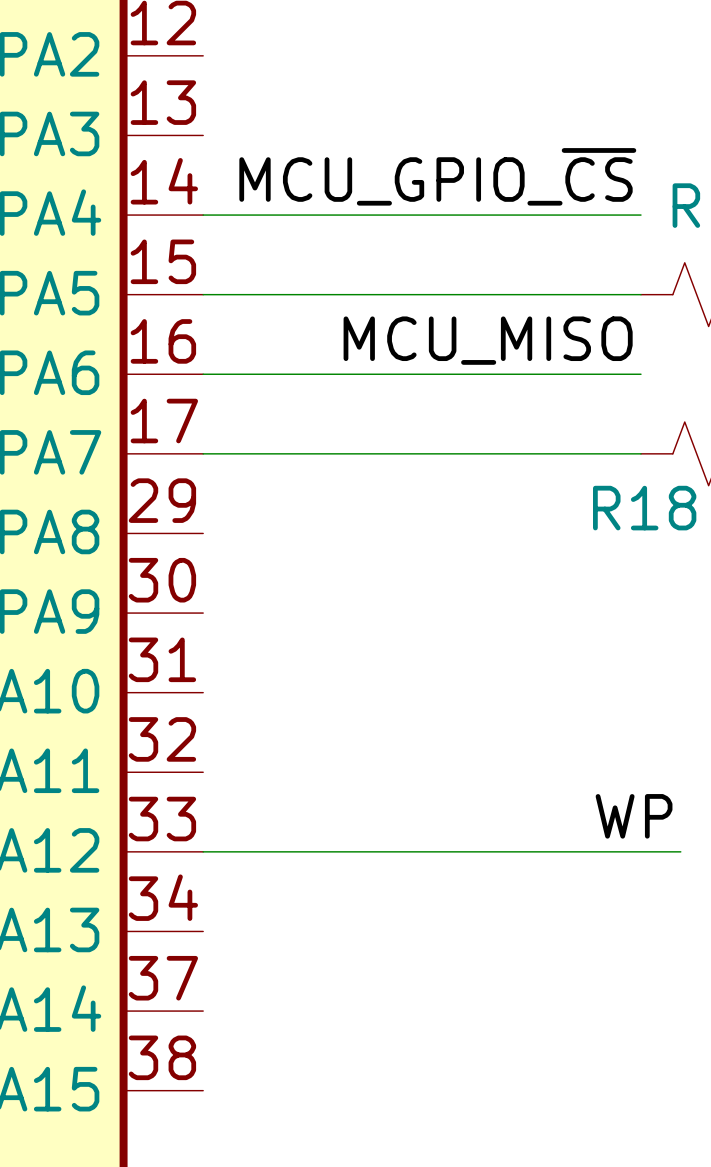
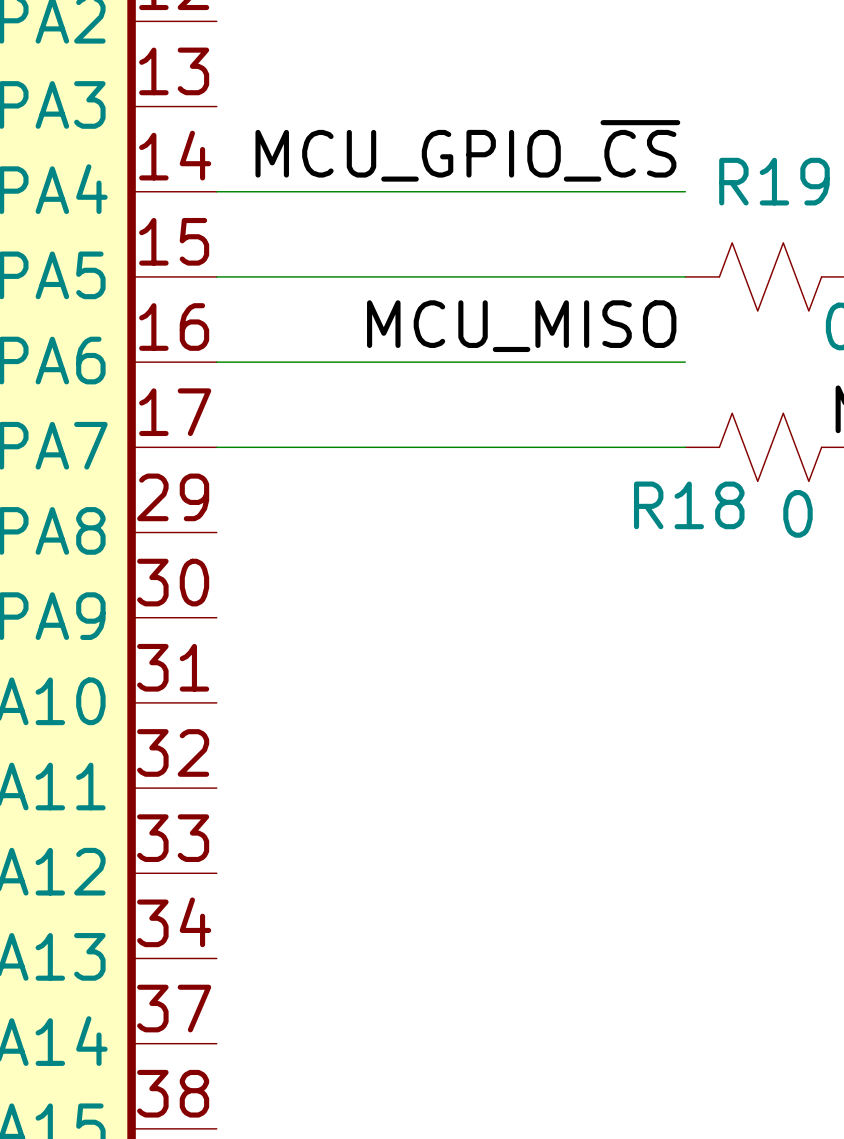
label: WP (634, 816) -> none
wire: (203, 851) (680, 851) -> none

